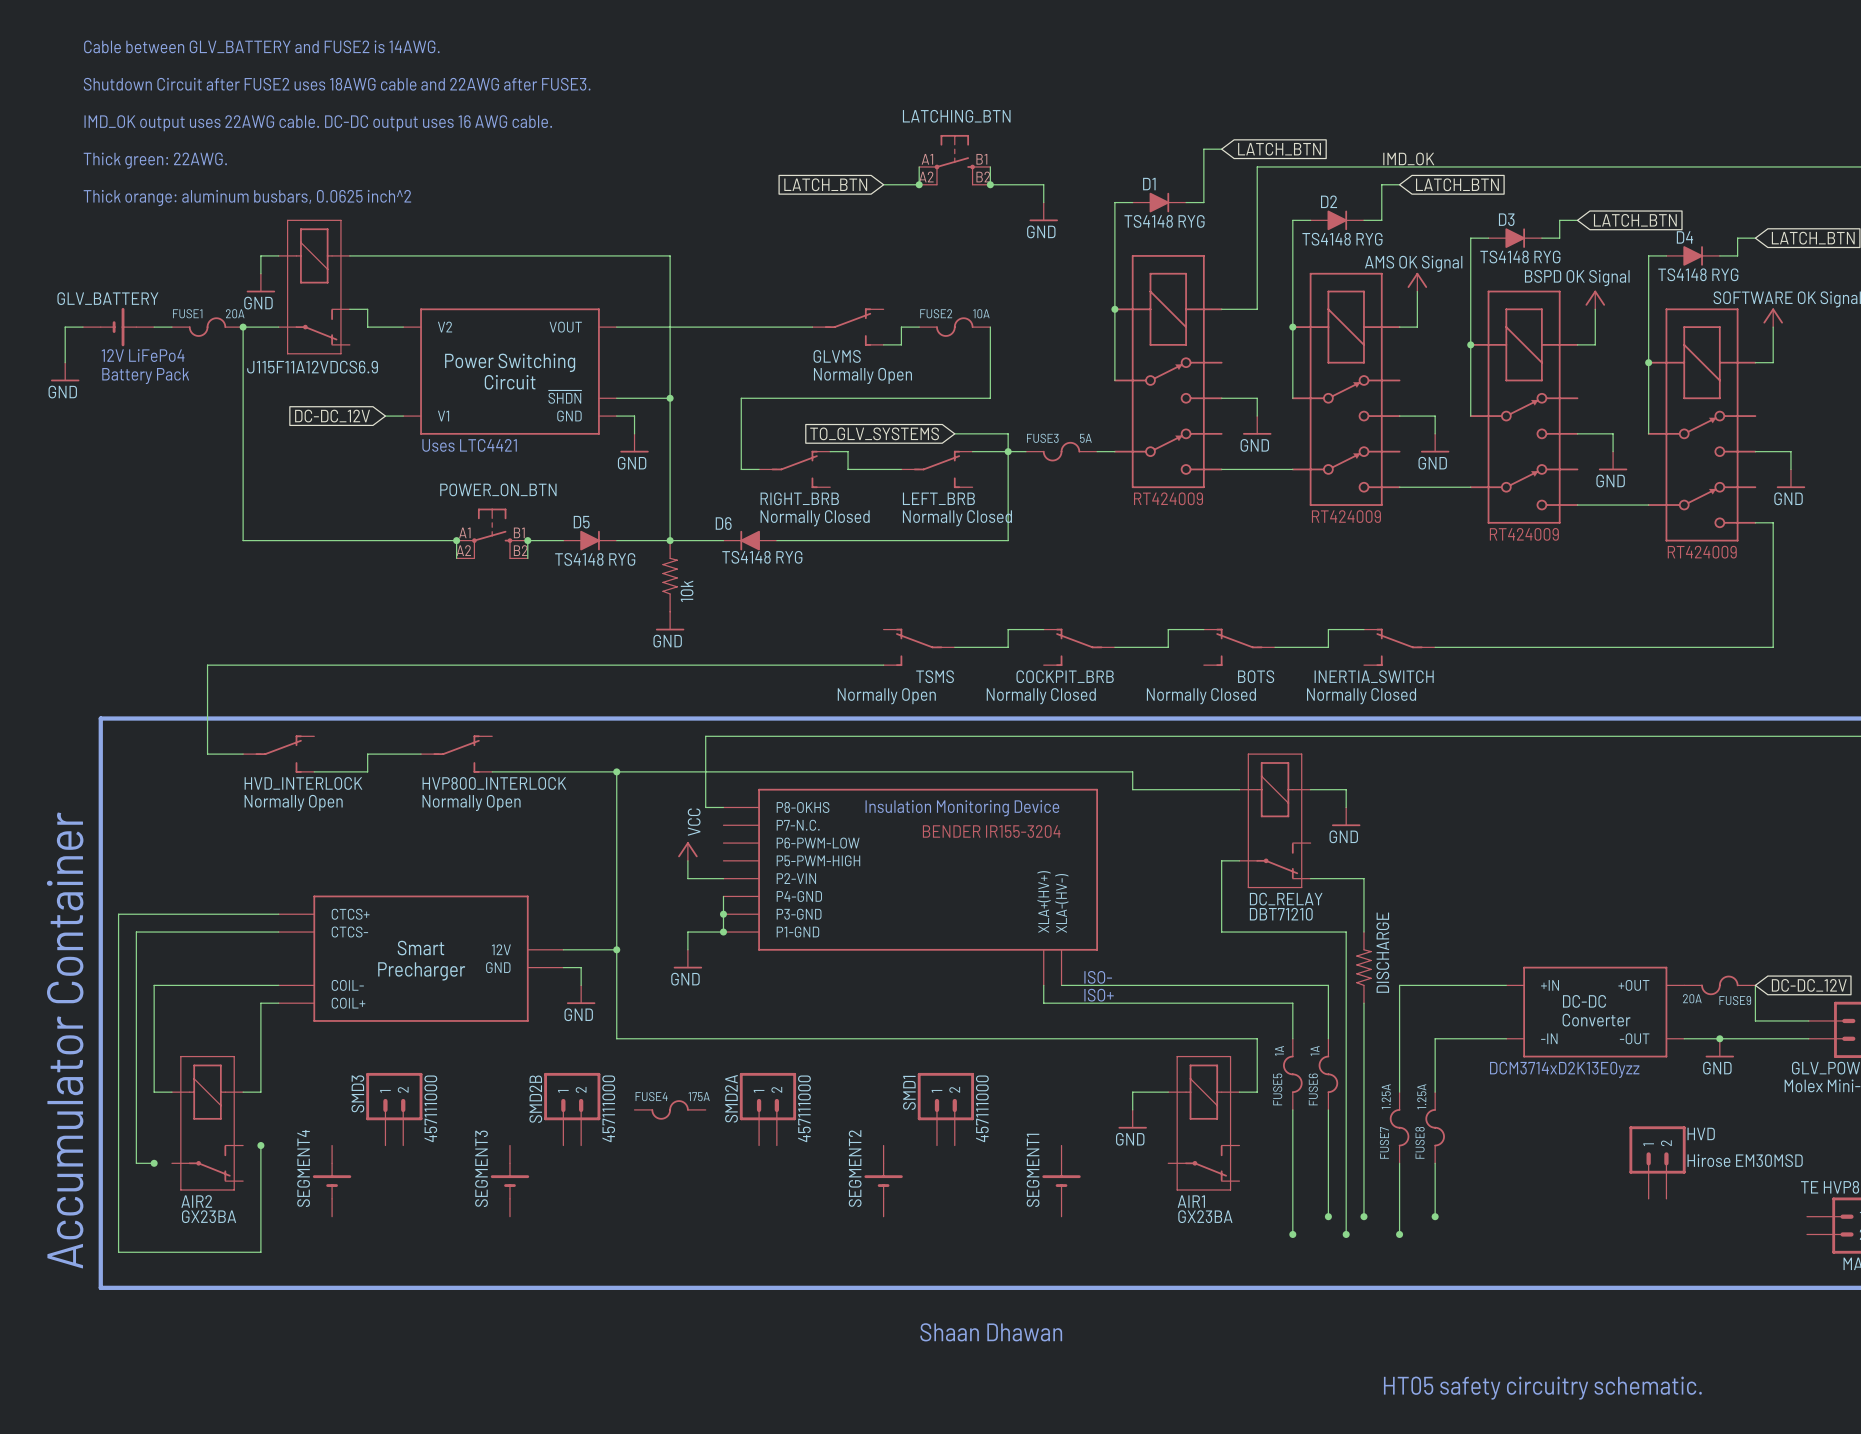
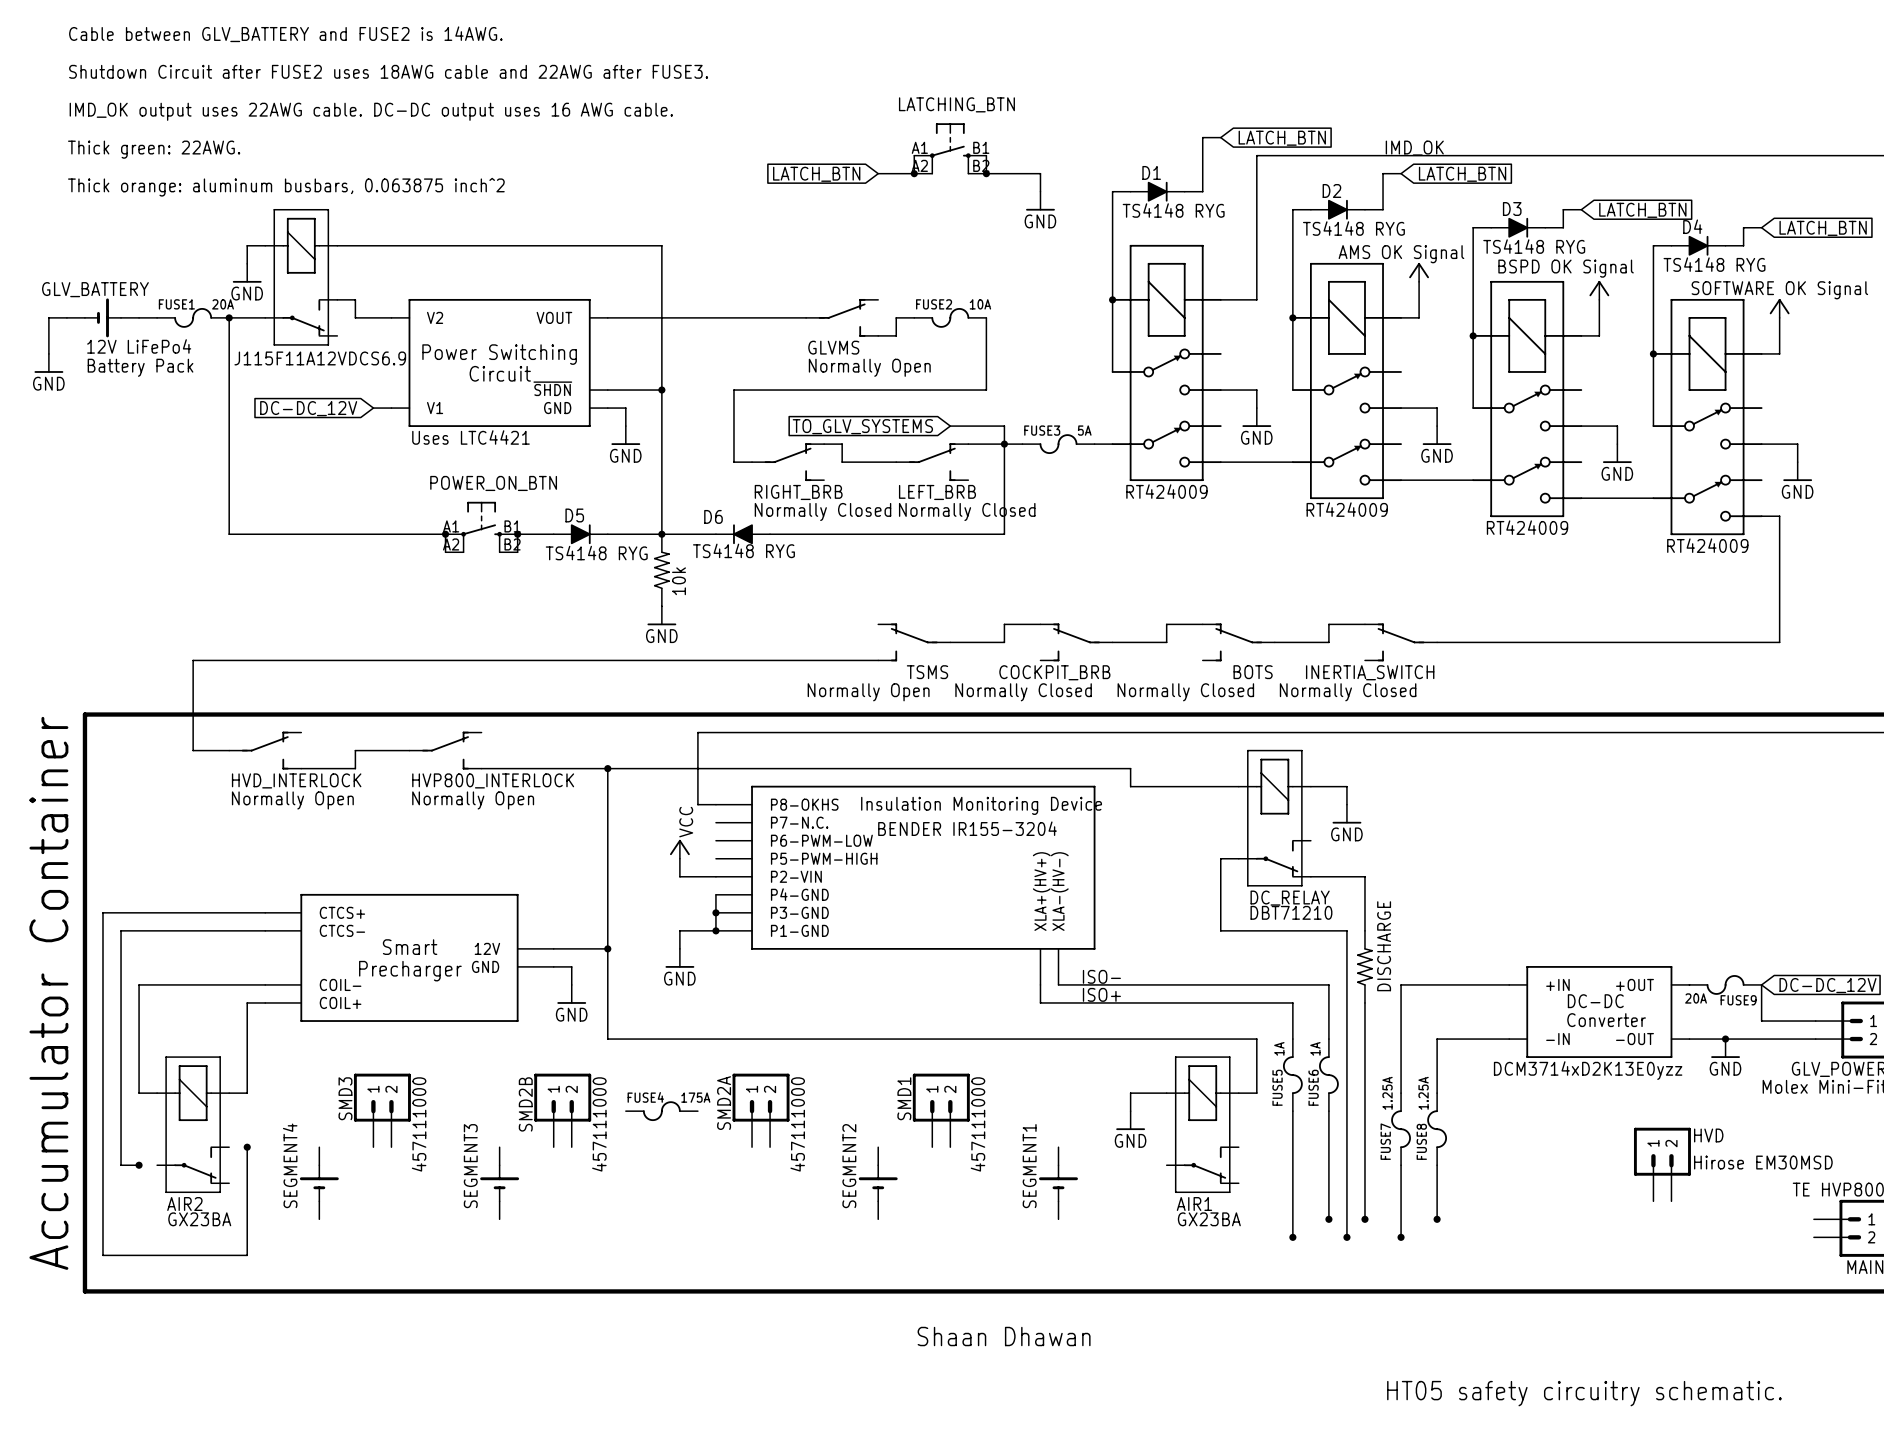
text: Thick orange: aluminum busbars, 0.0625 inch^2 (247, 198) -> Thick orange: aluminum busbars, 0.063875 inch^2 (286, 187)

